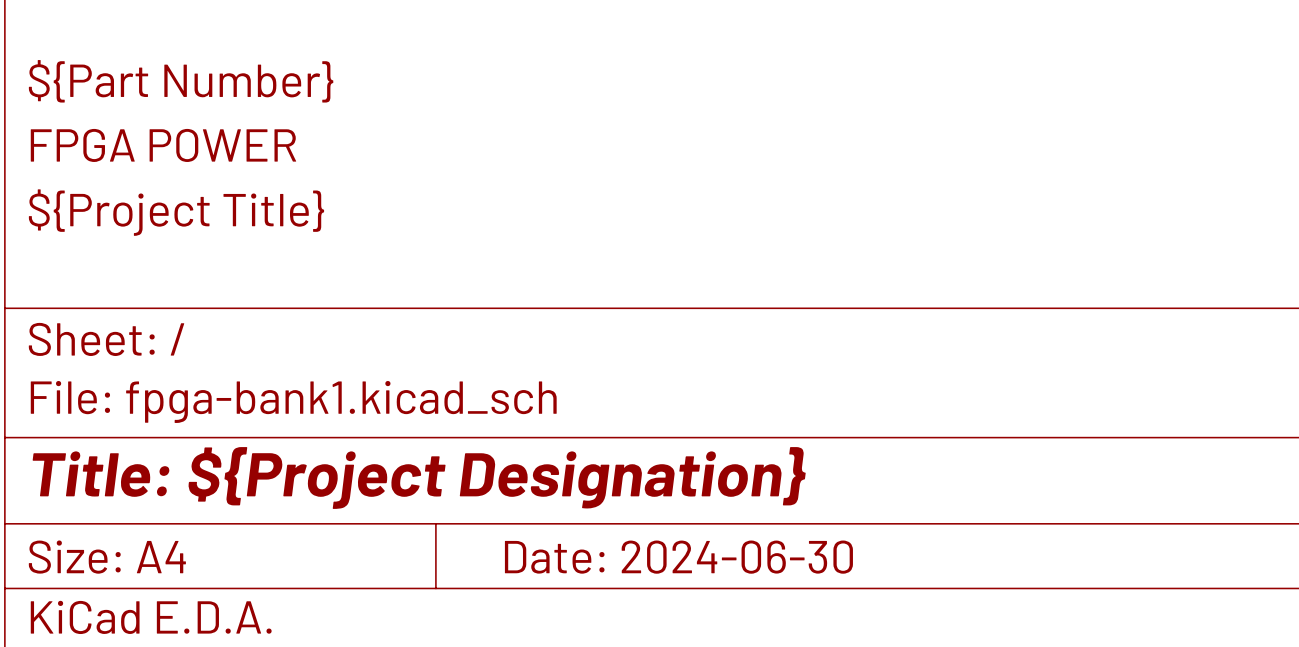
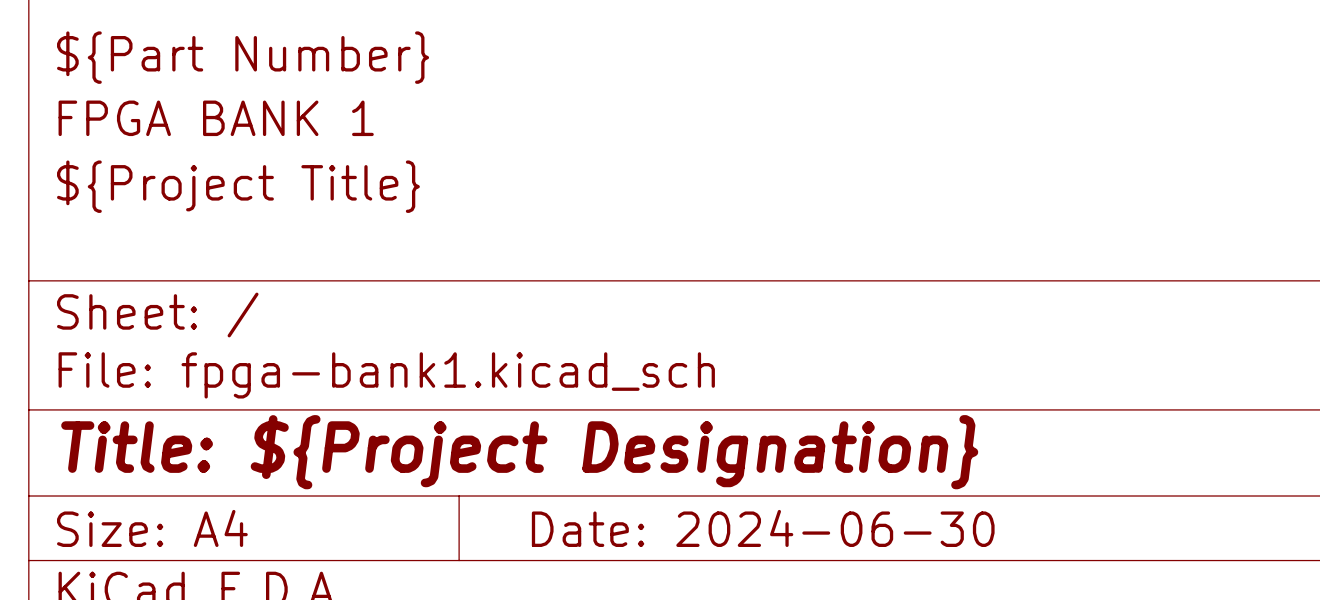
title block: FPGA POWER (163, 145) -> FPGA BANK 1 (216, 118)

